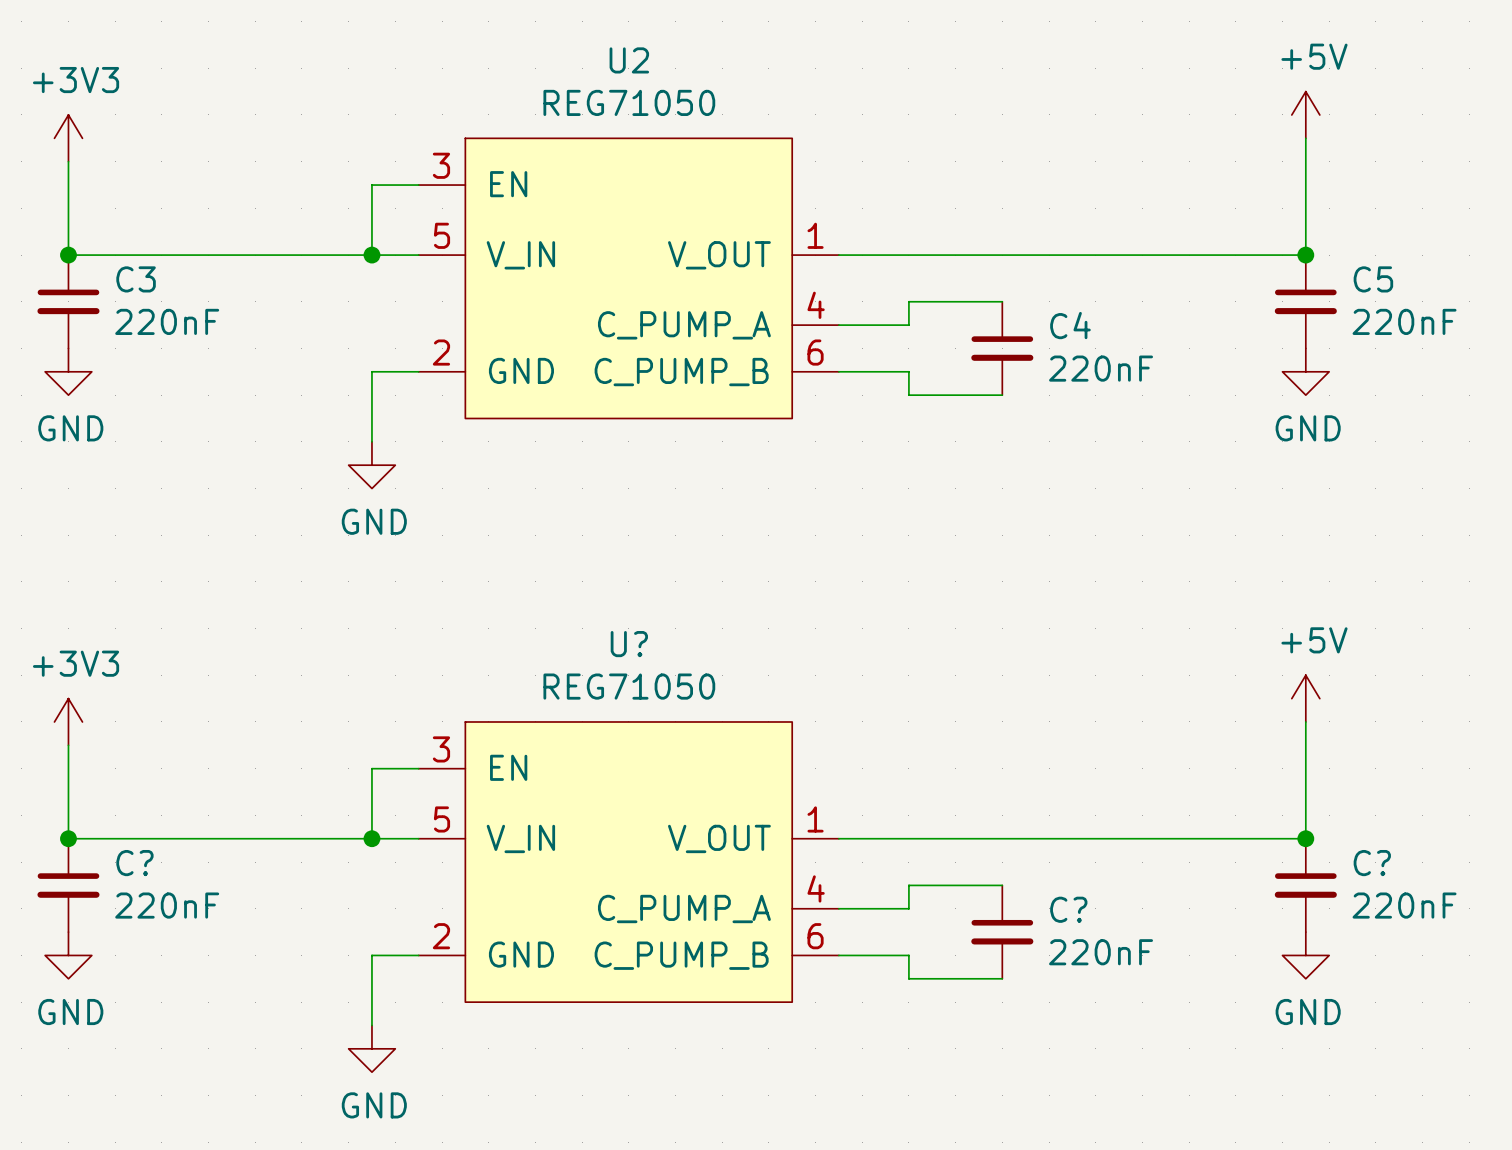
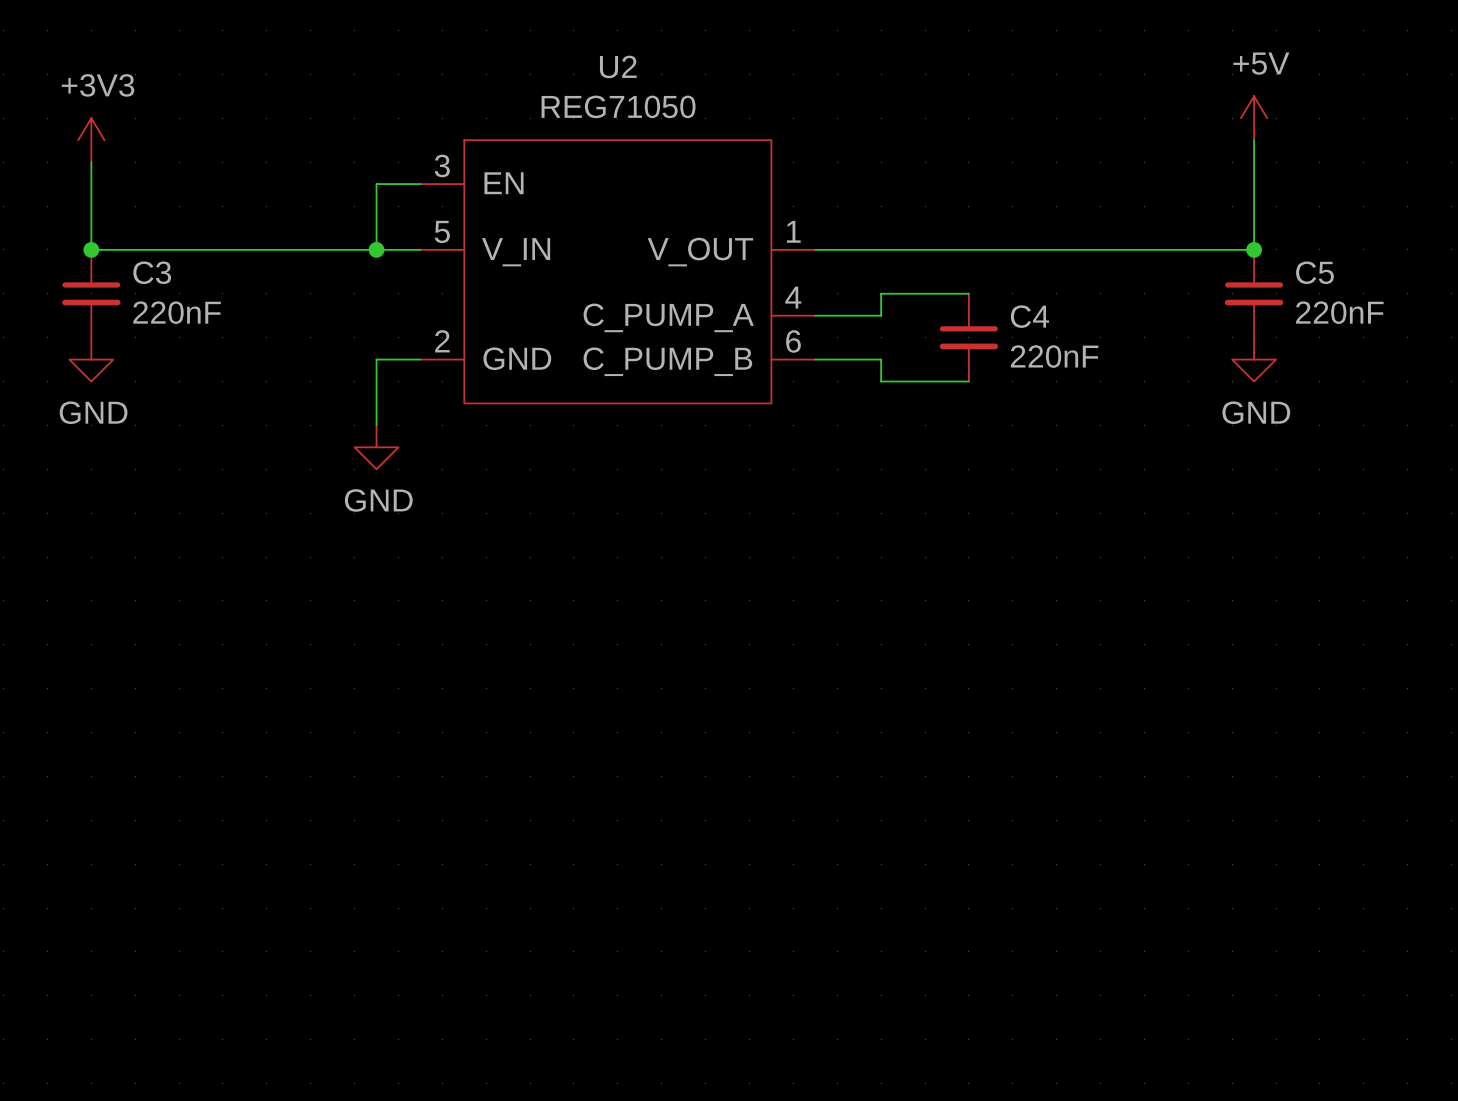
power symbol: +5V (1305, 698) -> none
power symbol: +3V3 (68, 721) -> none
wire: (1305, 721) (1305, 838) (838, 838) -> none
wire: (68, 745) (68, 838) (418, 838) -> none
wire: (418, 768) (371, 768) (371, 838) -> none
junction: (68, 838) -> none
junction: (371, 838) -> none
junction: (1305, 838) -> none
U?: REG71050 (628, 862) -> none
C?: 220nF (68, 885) -> none
wire: (1002, 885) (908, 885) (908, 908) (838, 908) -> none
C?: 220nF (1305, 885) -> none
C?: 220nF (1002, 932) -> none
power symbol: GND (68, 955) -> none
wire: (418, 955) (371, 955) (371, 1025) -> none
wire: (838, 955) (908, 955) (908, 978) (1002, 978) -> none
power symbol: GND (1305, 955) -> none
power symbol: GND (371, 1048) -> none

